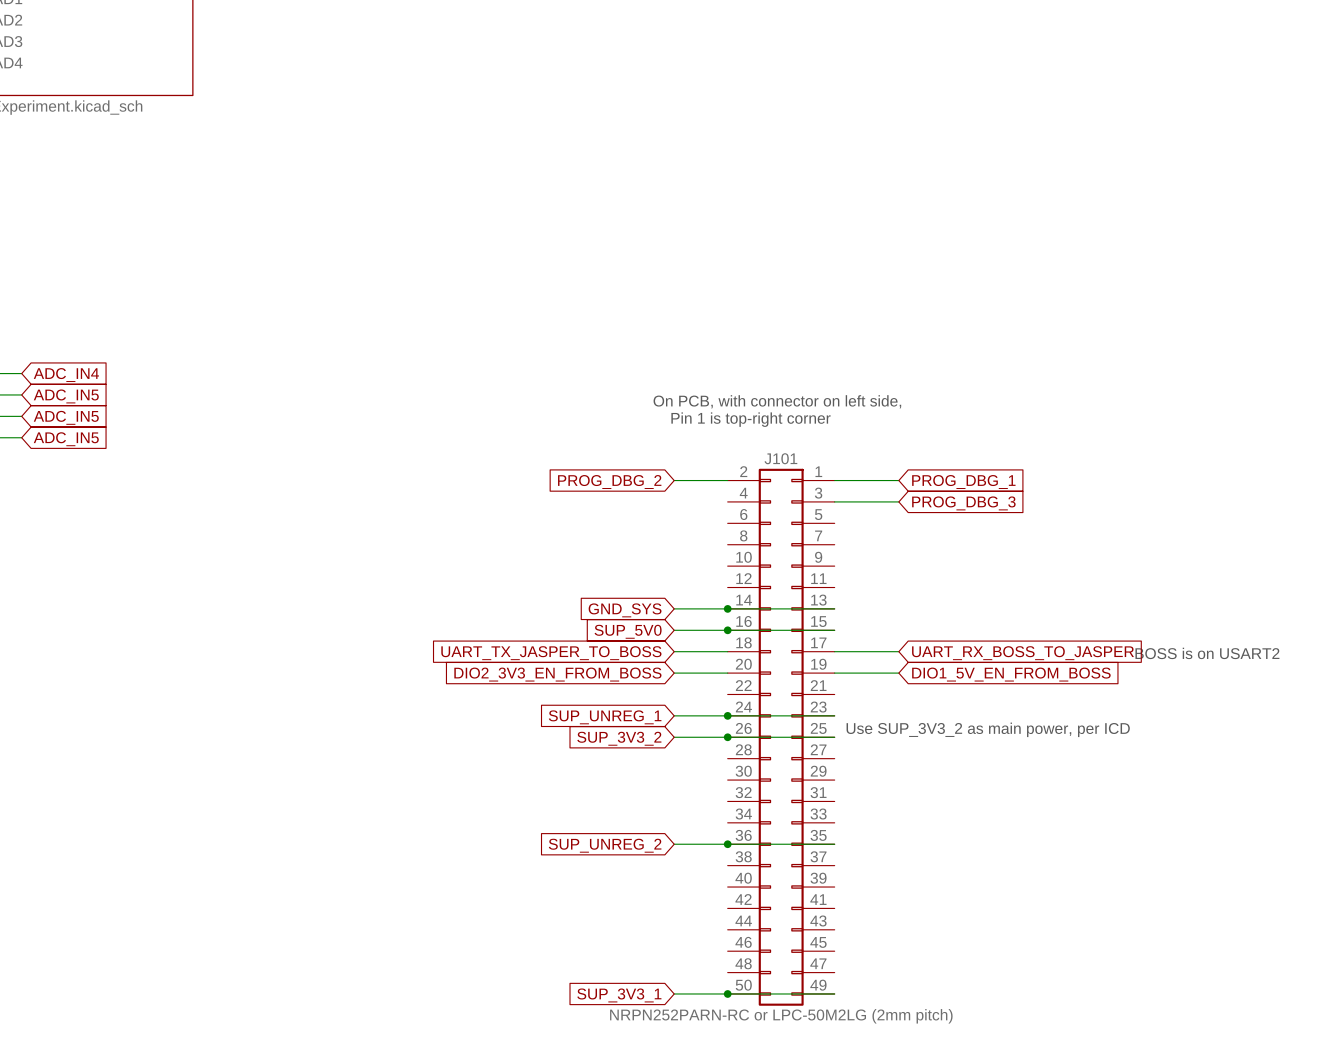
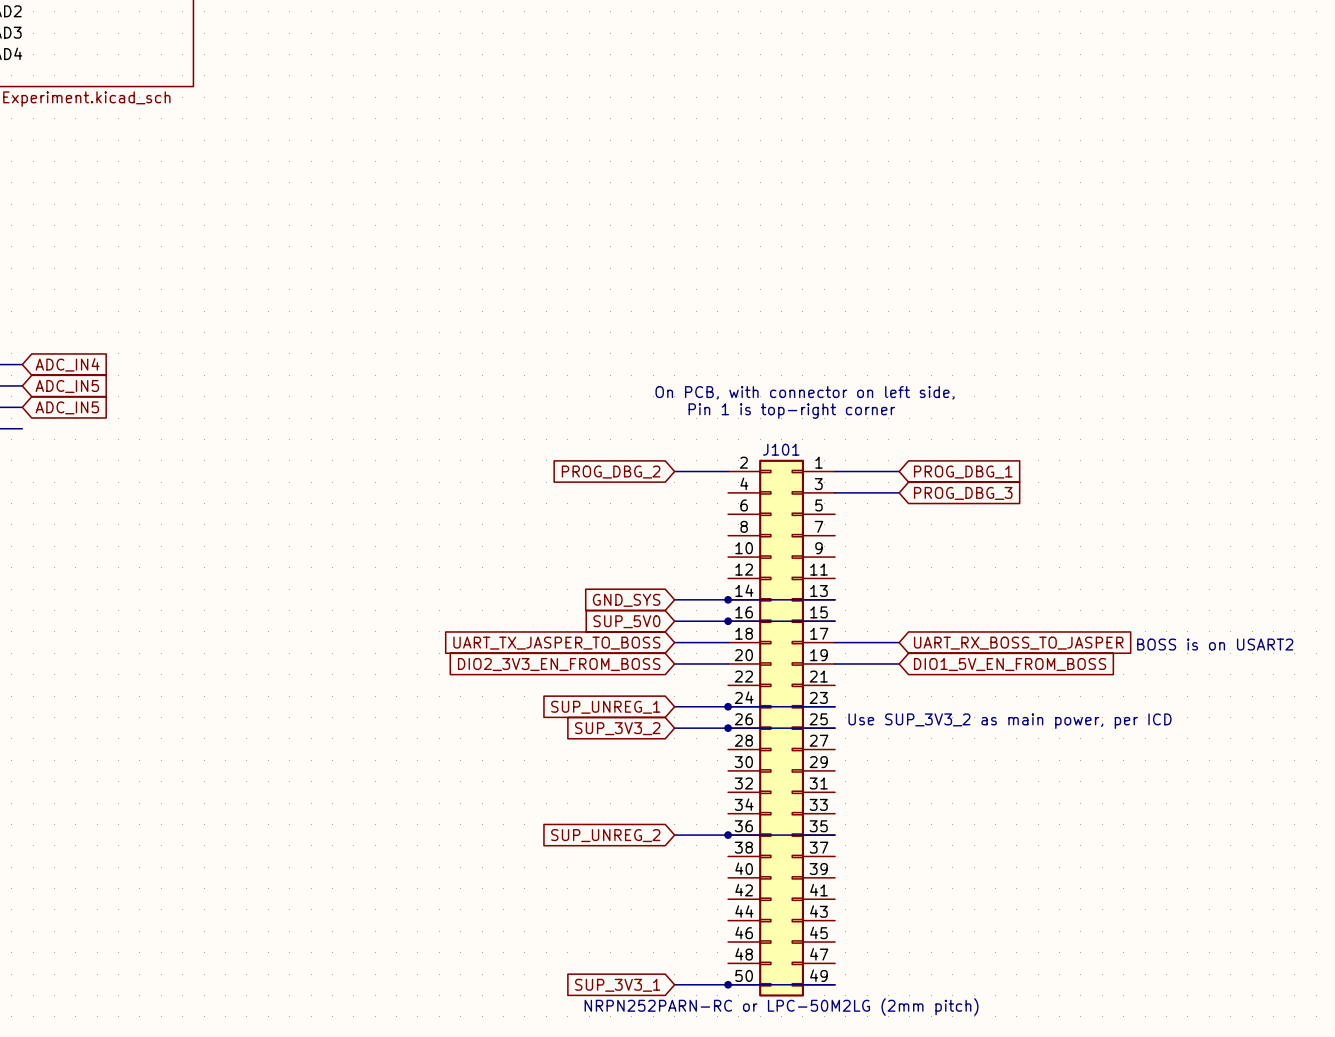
global label: ADC_IN5 (66, 439) -> none

